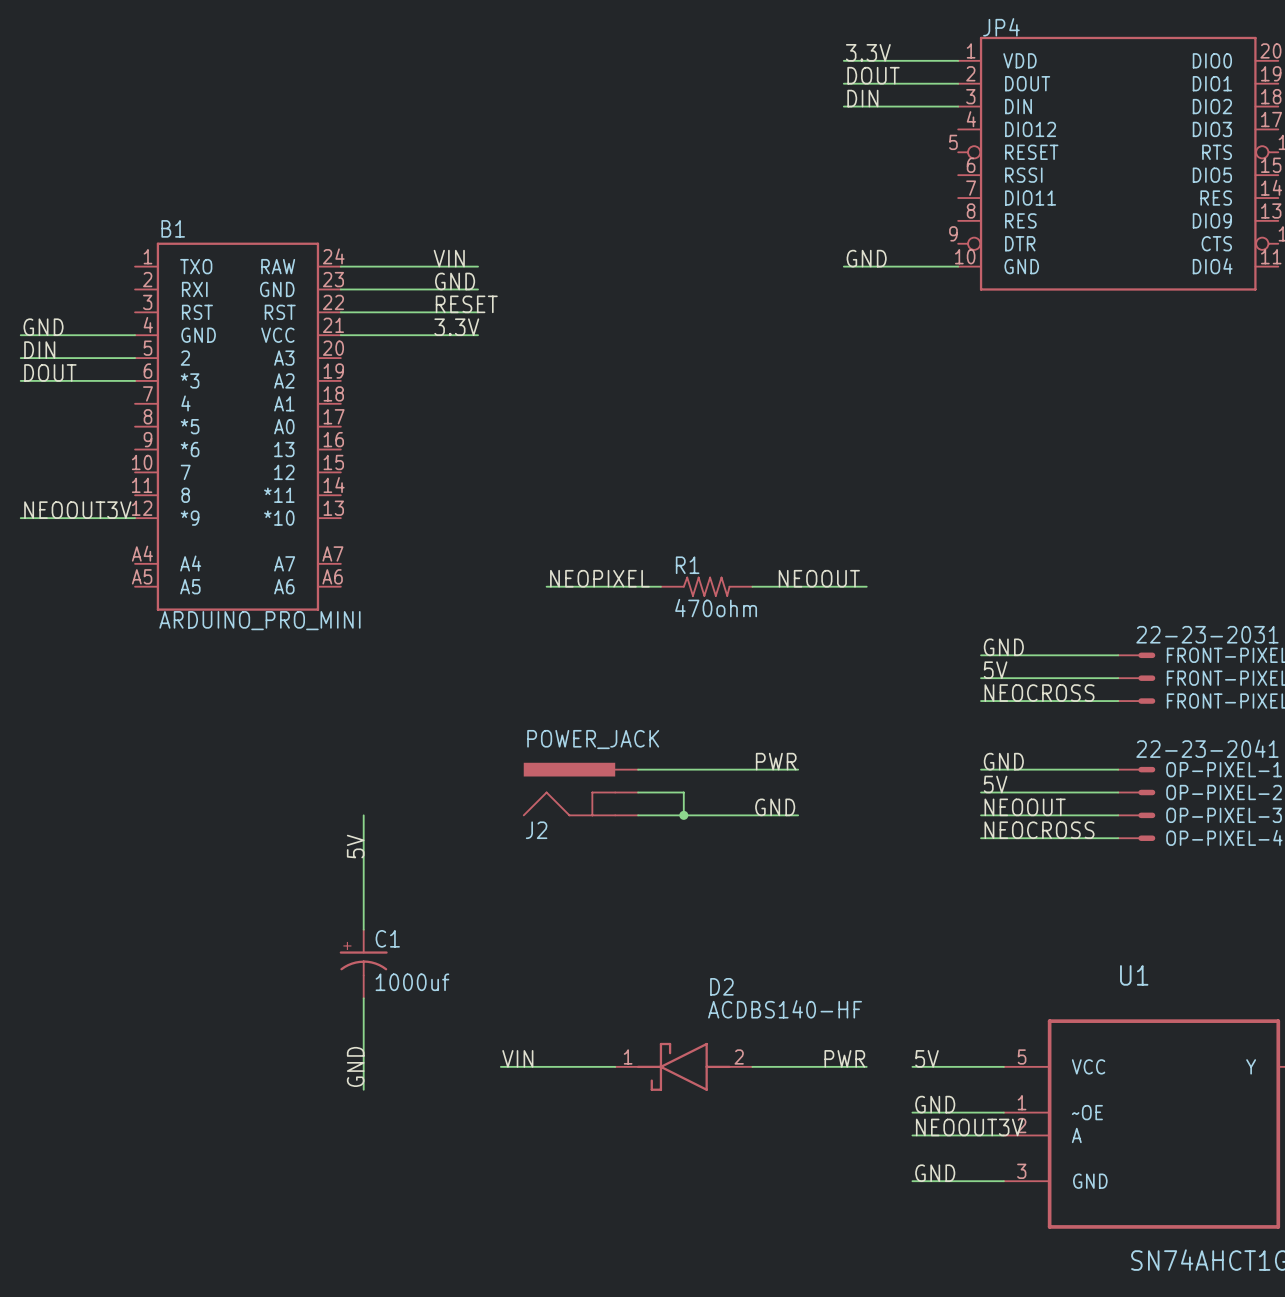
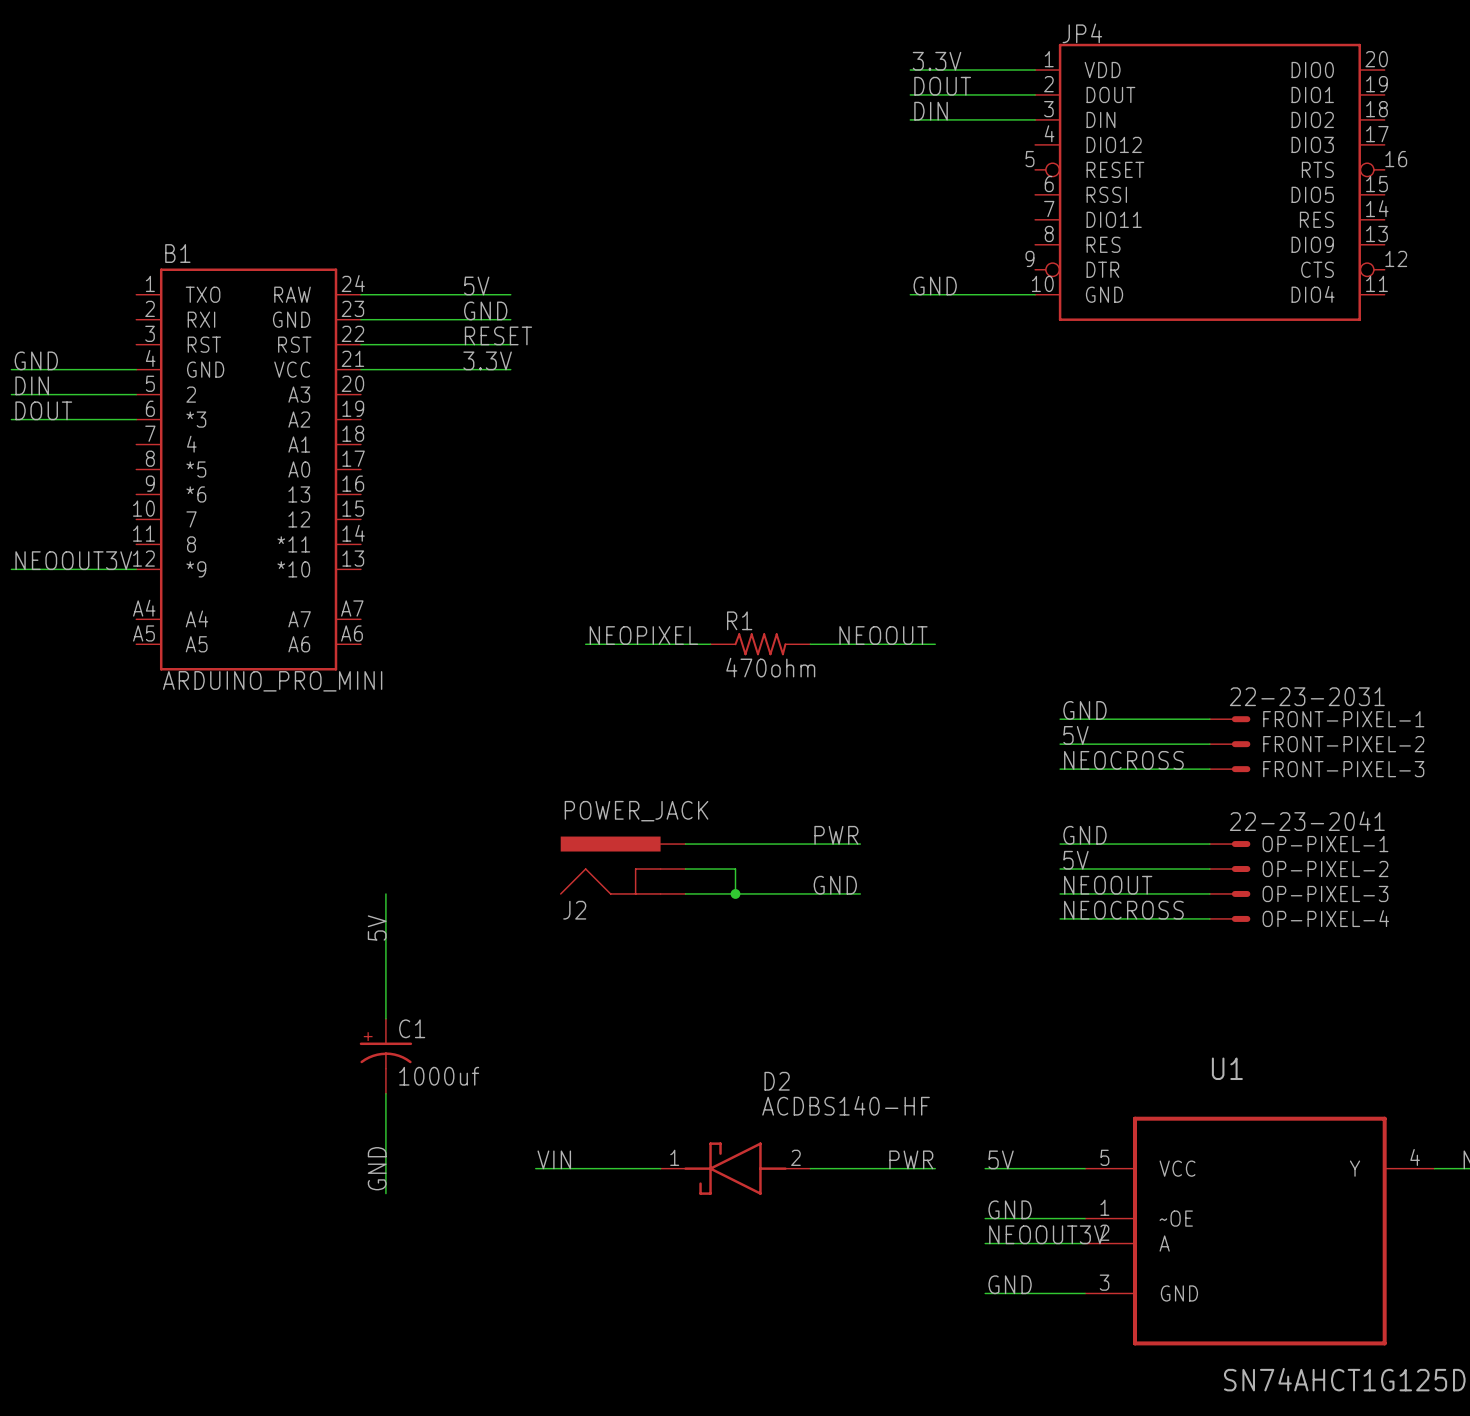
label: VIN (449, 258) -> 5V (476, 285)

